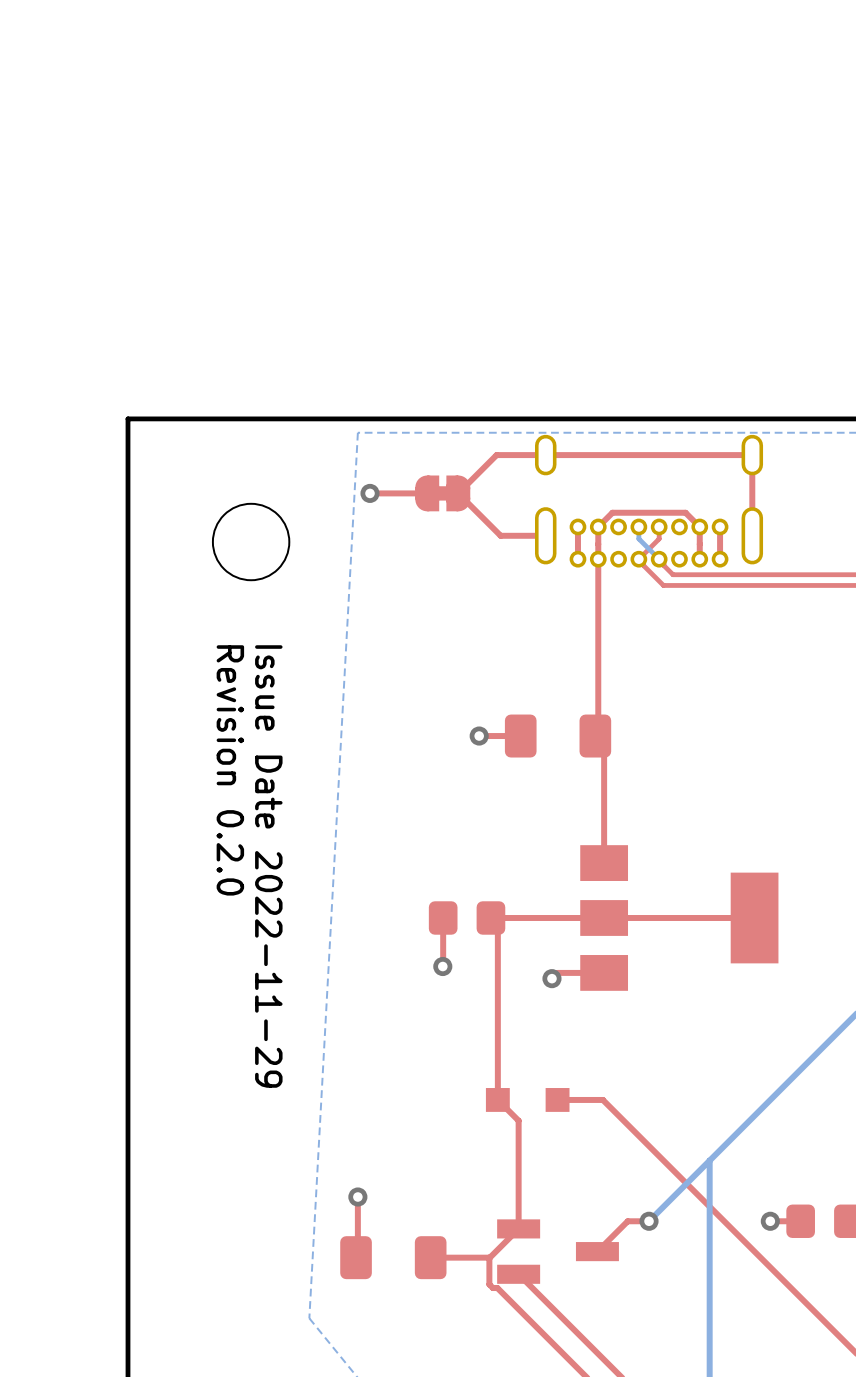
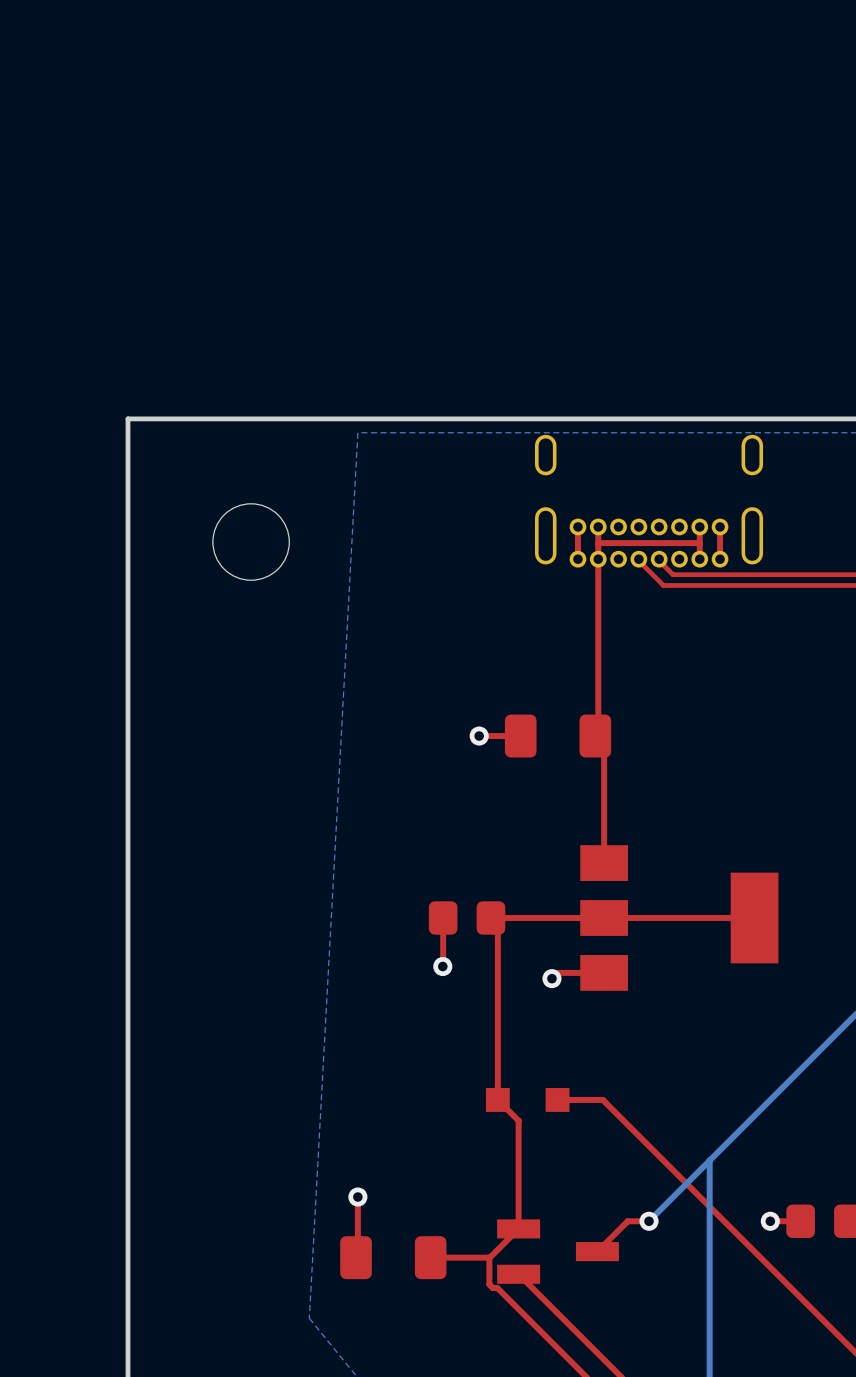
via: (370, 493) -> none
top track: (427, 493) (370, 493) -> none
part: (442, 493) -> none
bottom track: (638, 526) (638, 538) (659, 559) -> none
top track: (659, 526) (659, 538) (638, 559) -> none
top track: (699, 526) (685, 512) (612, 512) (598, 526) -> none
top track: (752, 535) (752, 455) (496, 455) (458, 493) (500, 535) (545, 535) -> none
top track: none -> (699, 544) (598, 544)
text: Revision 0.2.0 (230, 770) -> none
text: Issue Date 2022-11-29 (268, 866) -> none

